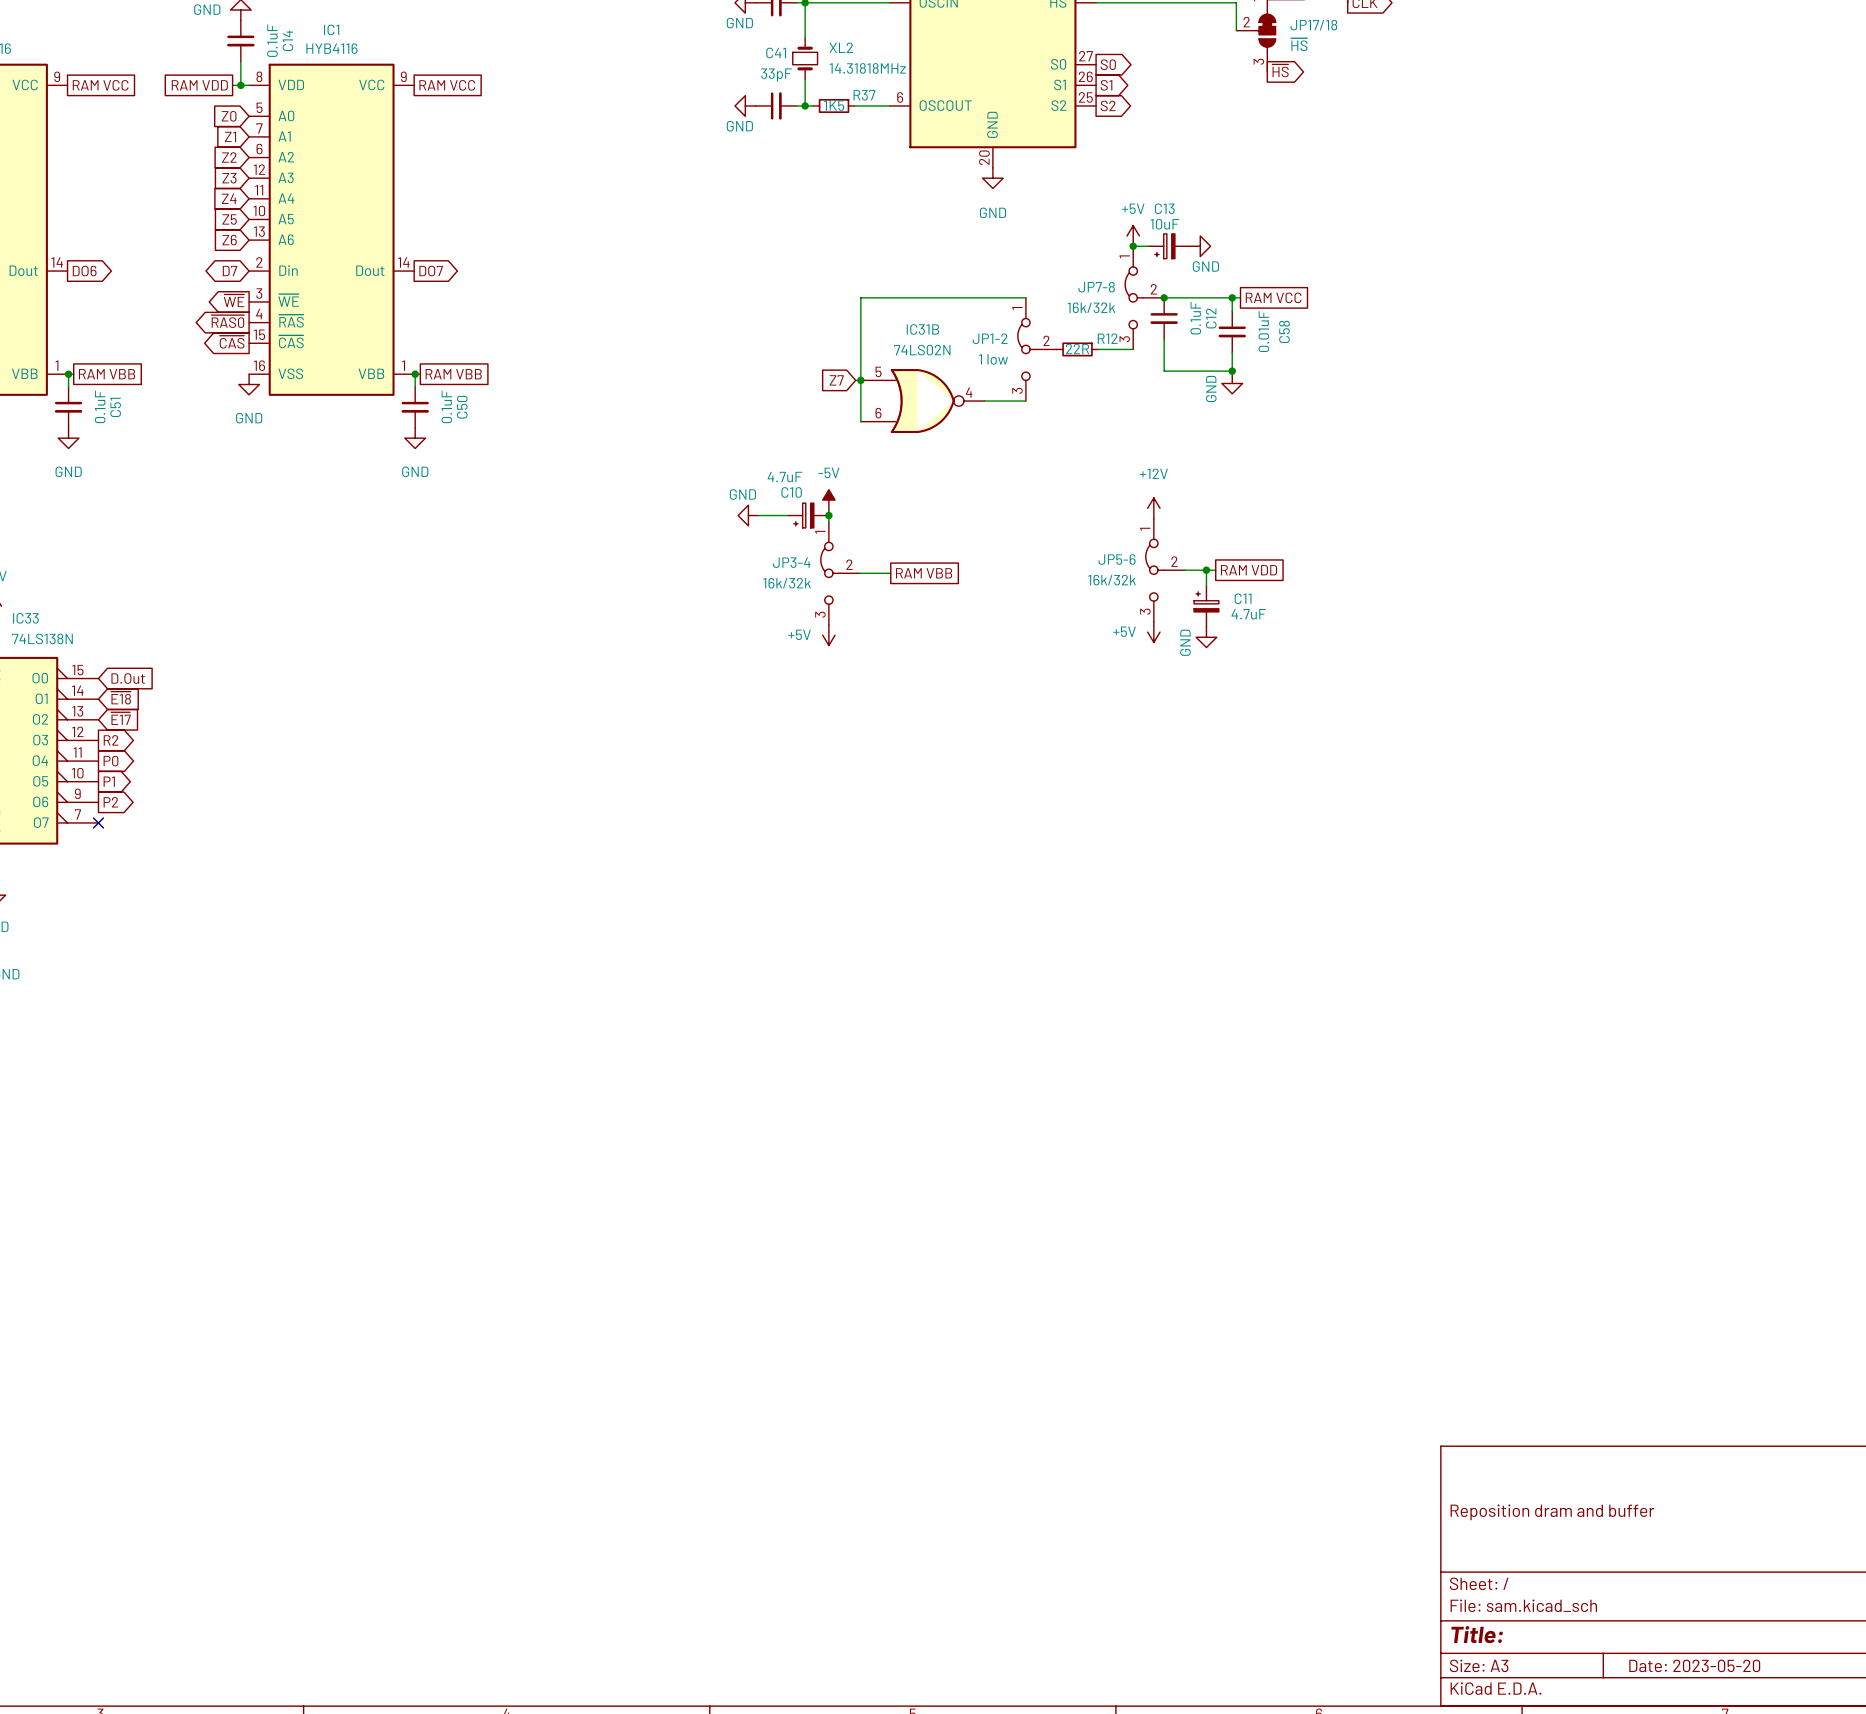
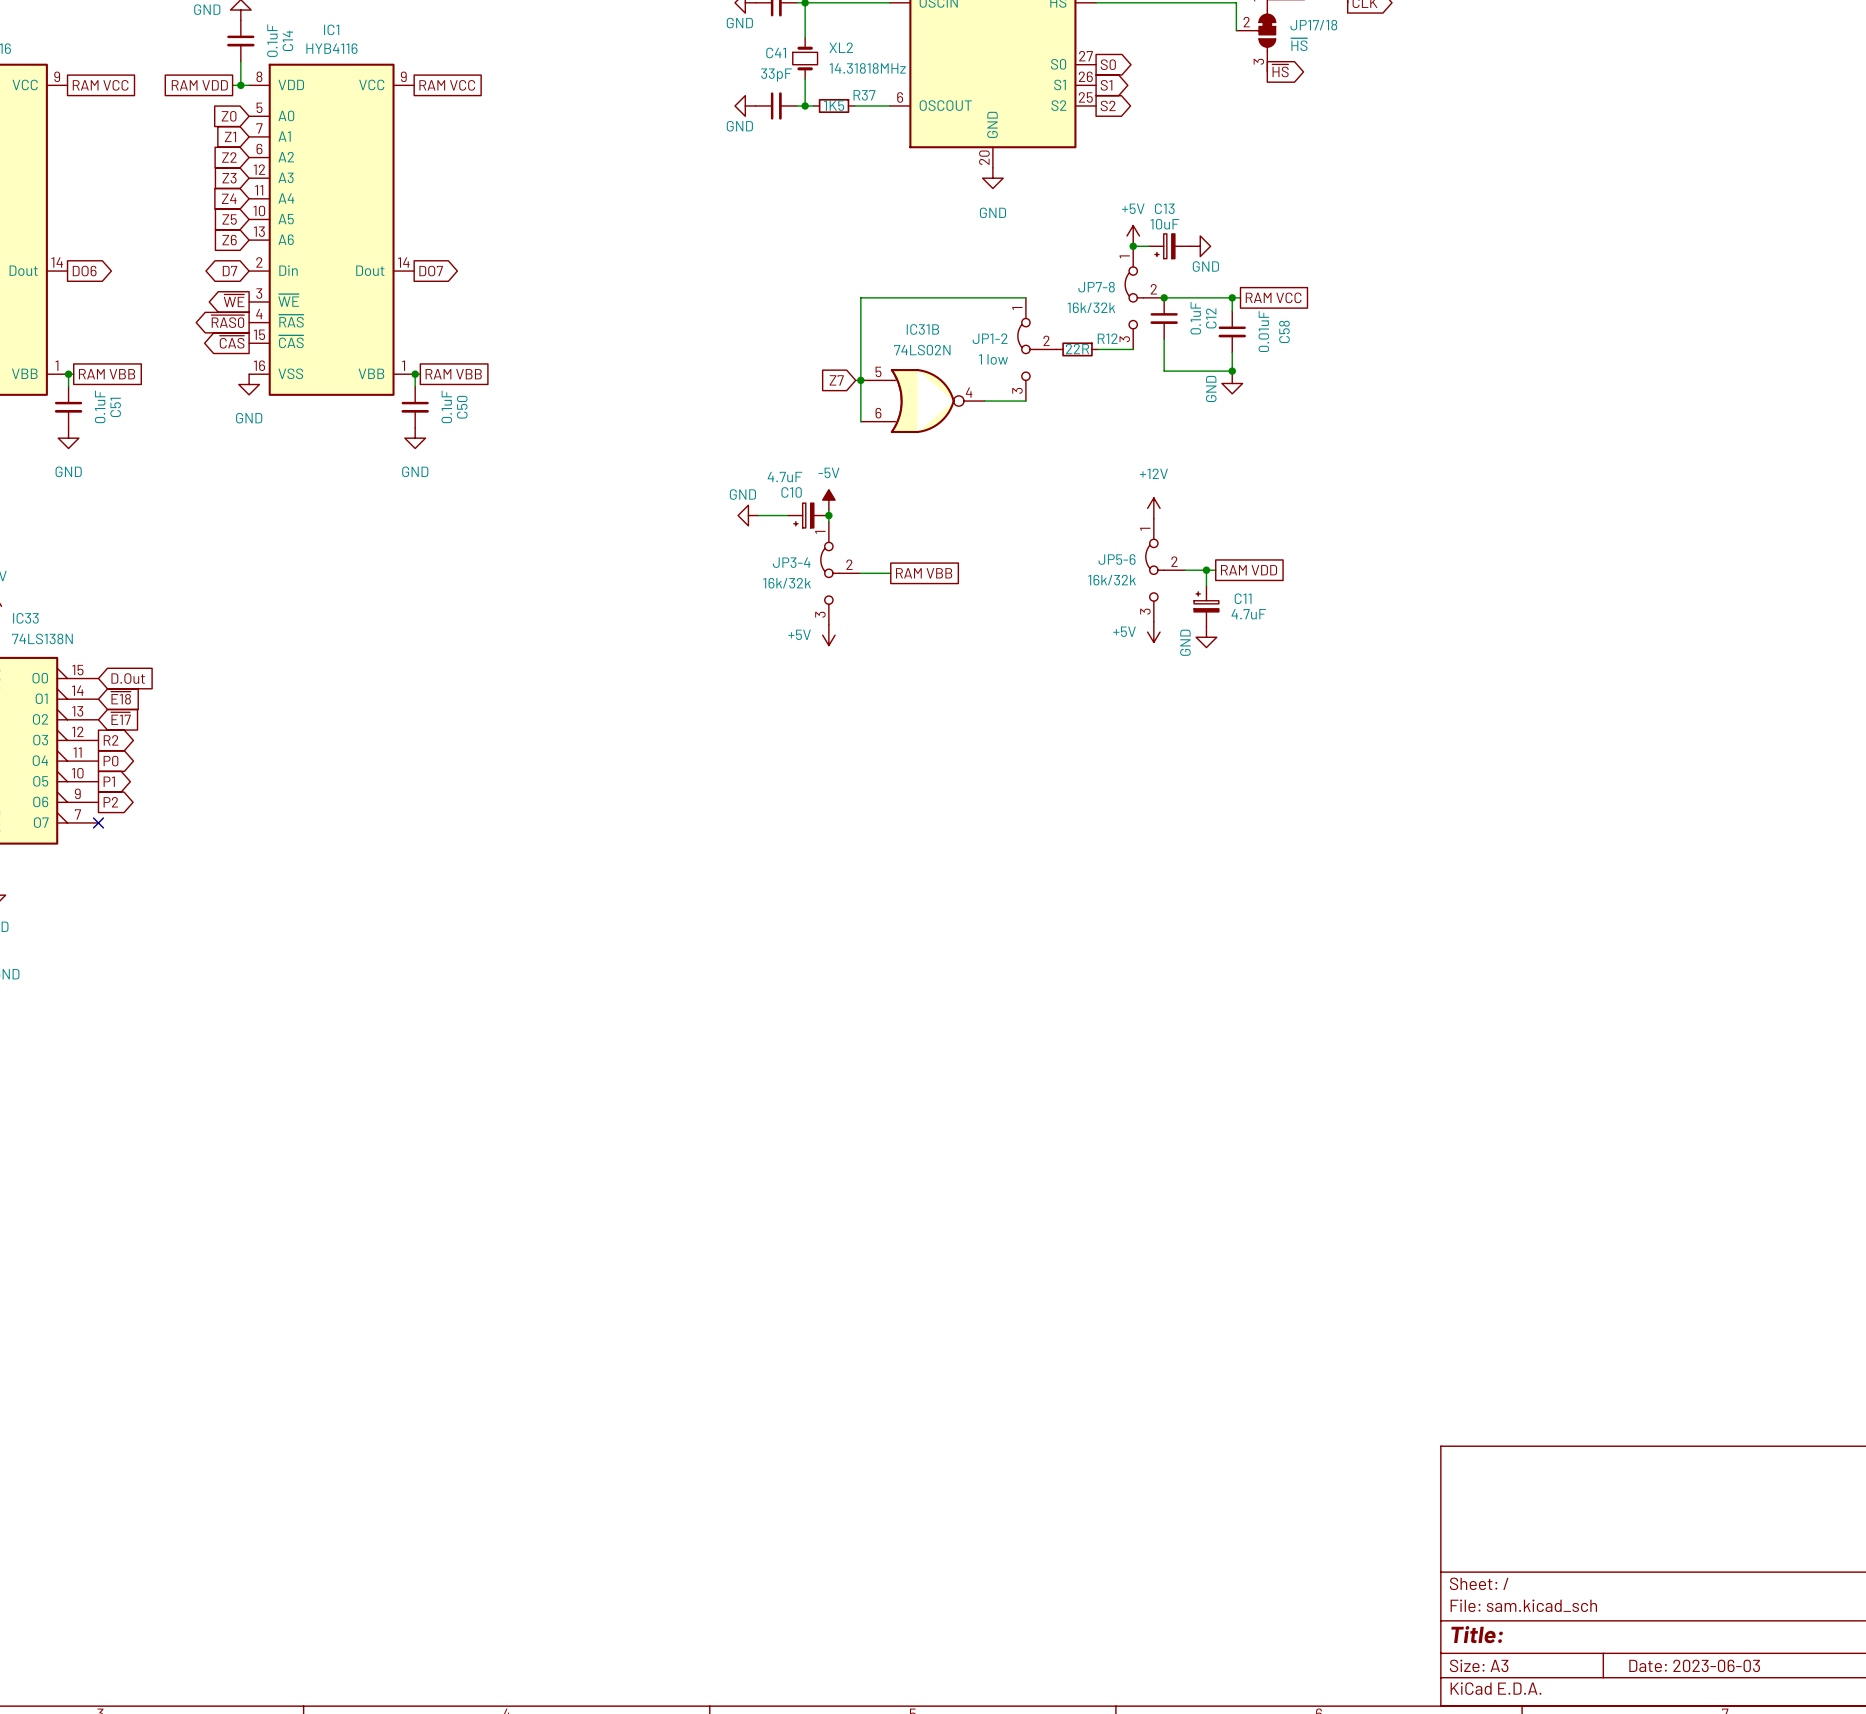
title block: Reposition dram and buffer (1552, 1512) -> none
title block: Date: 2023-05-20 (1694, 1665) -> Date: 2023-06-03 (1694, 1665)

